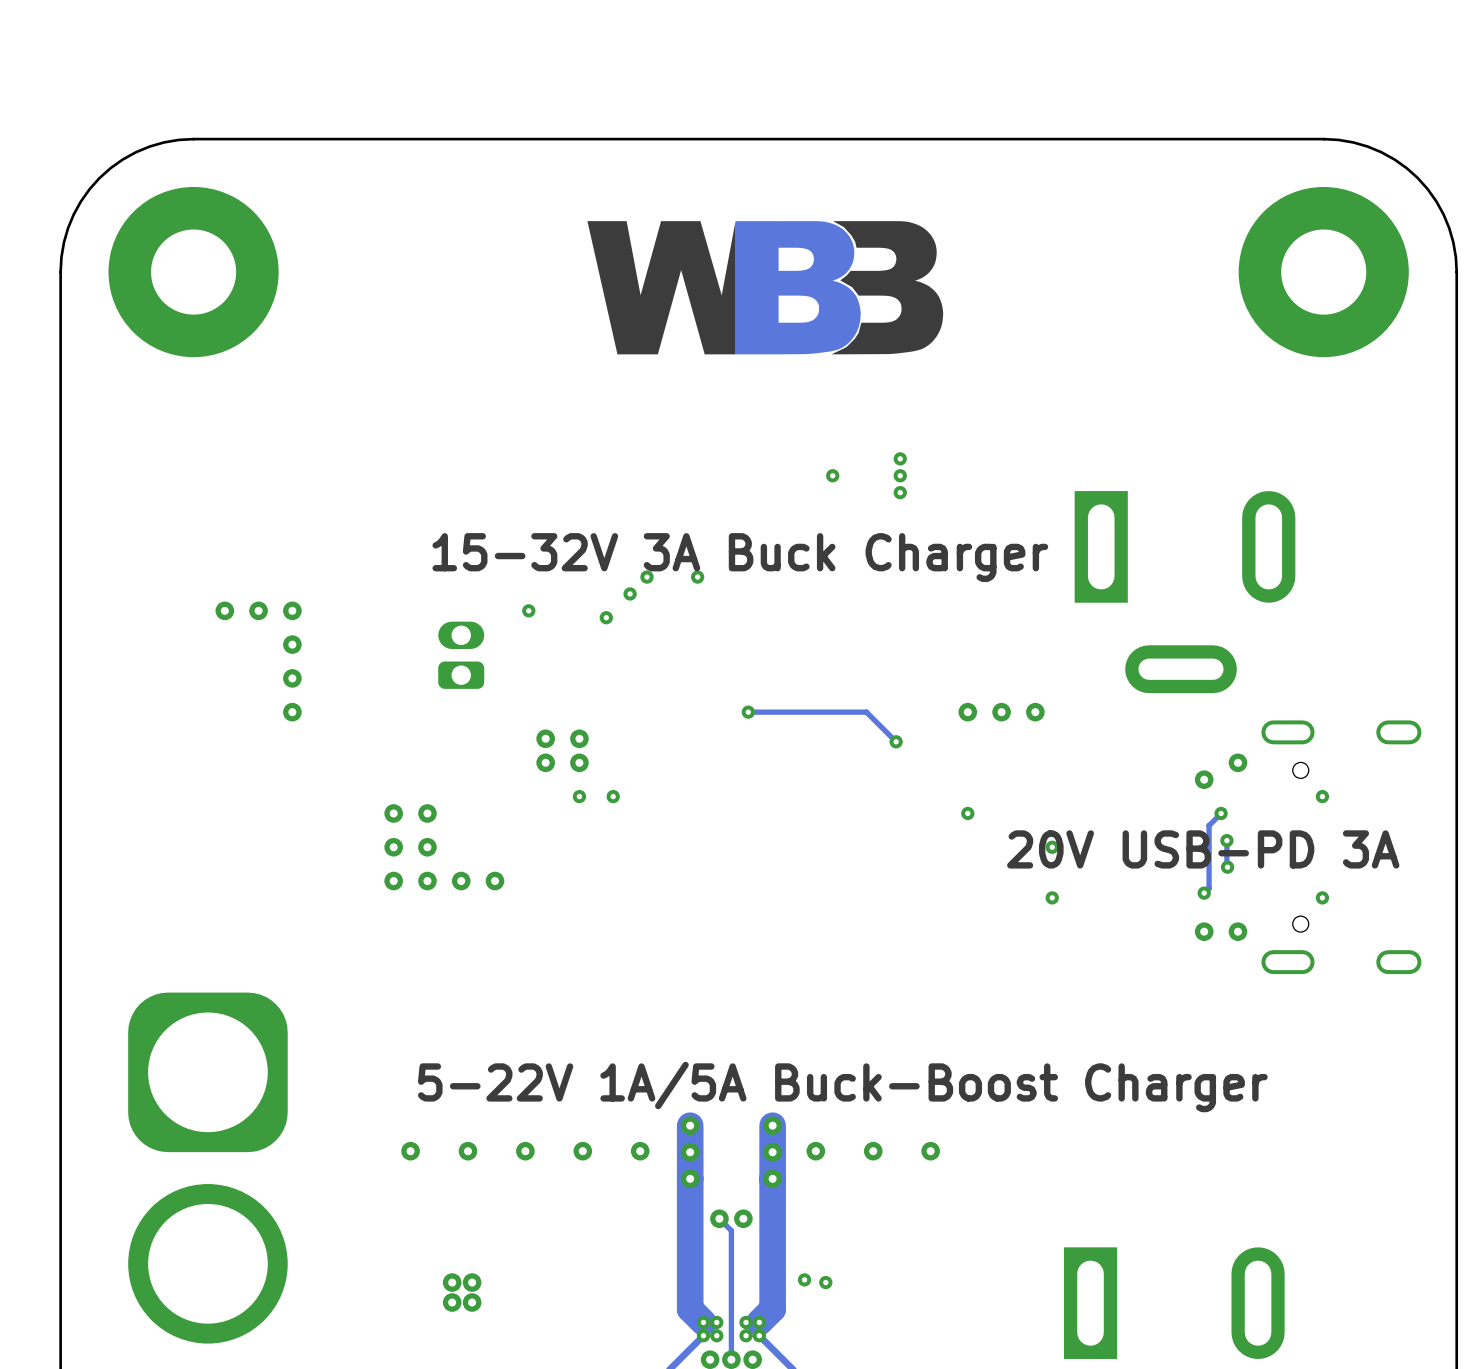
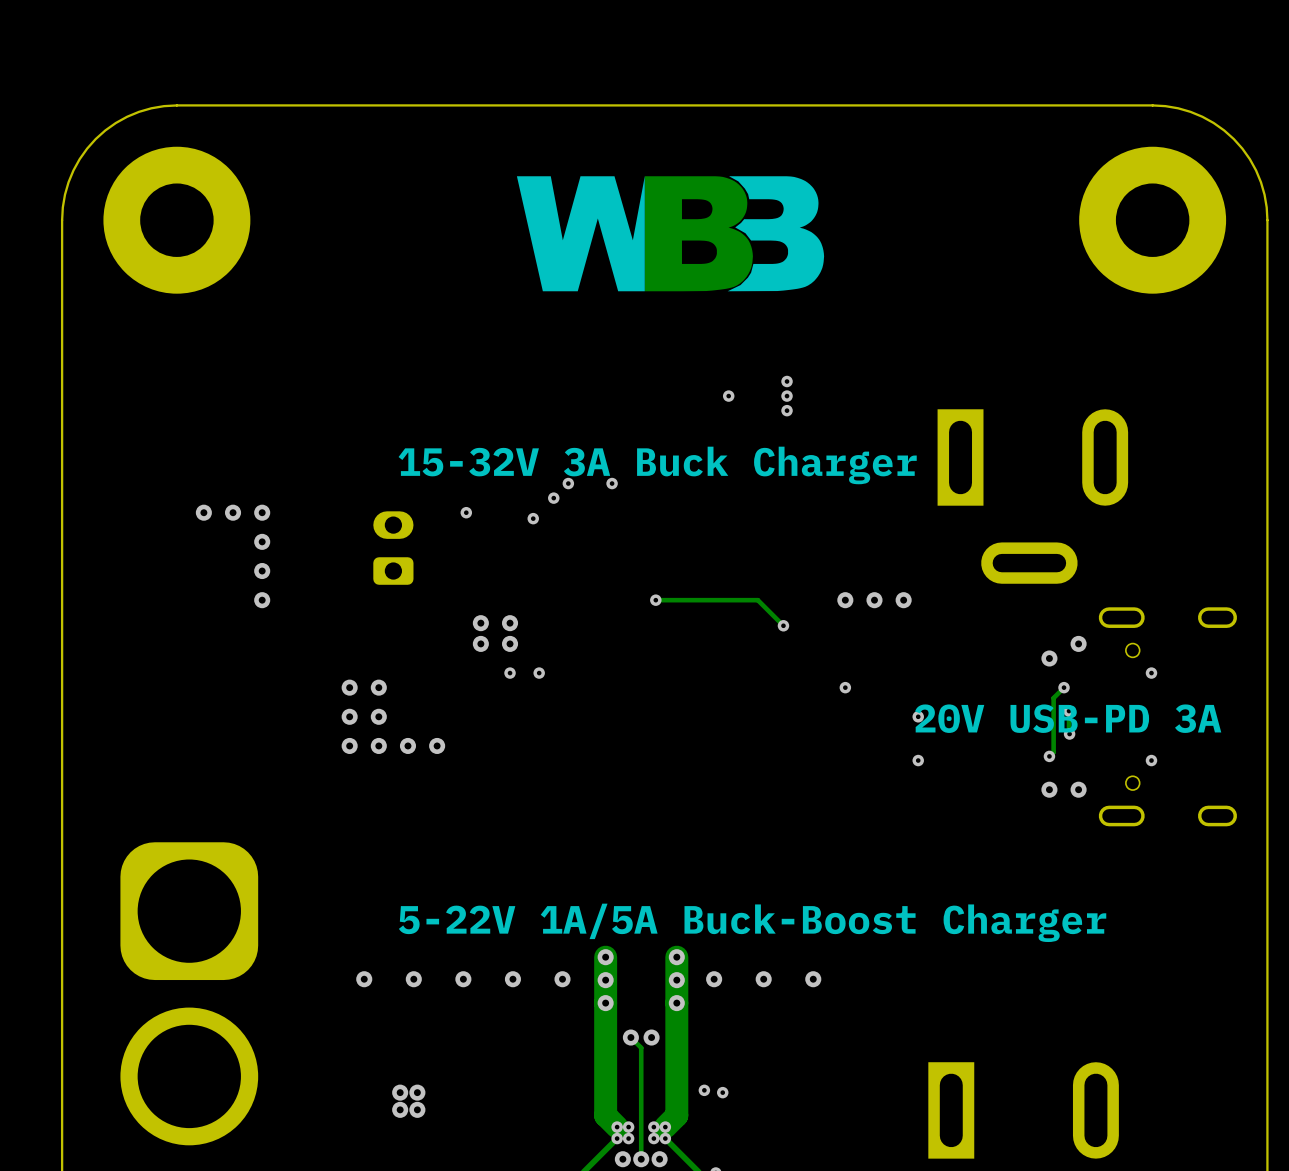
part footprint: [438, 621, 485, 689] -> [373, 511, 414, 585]

